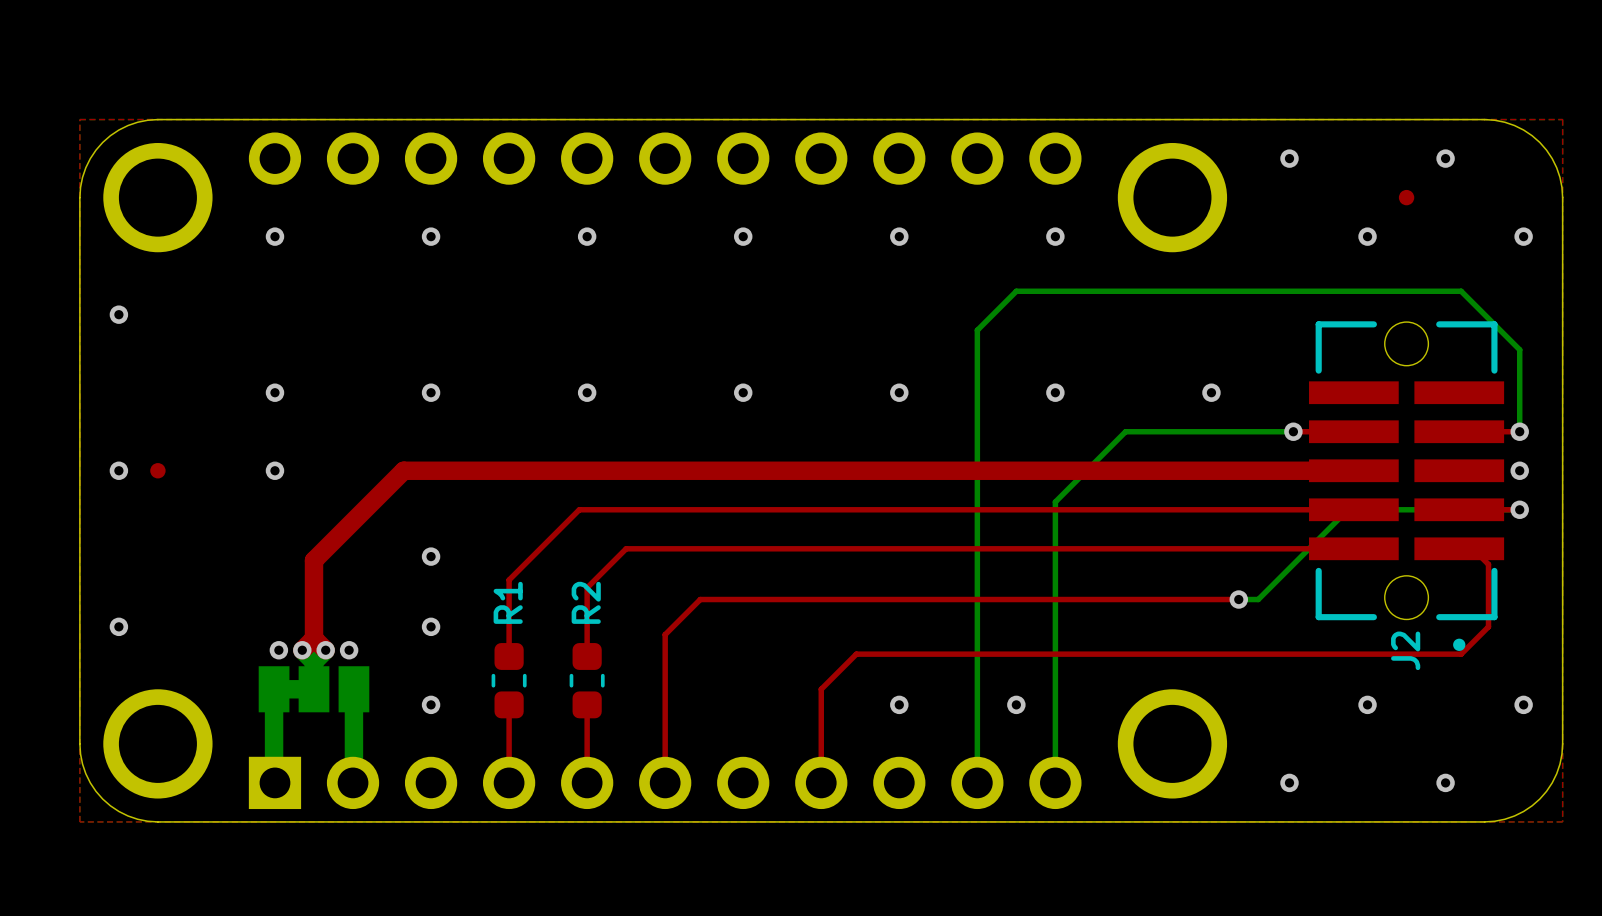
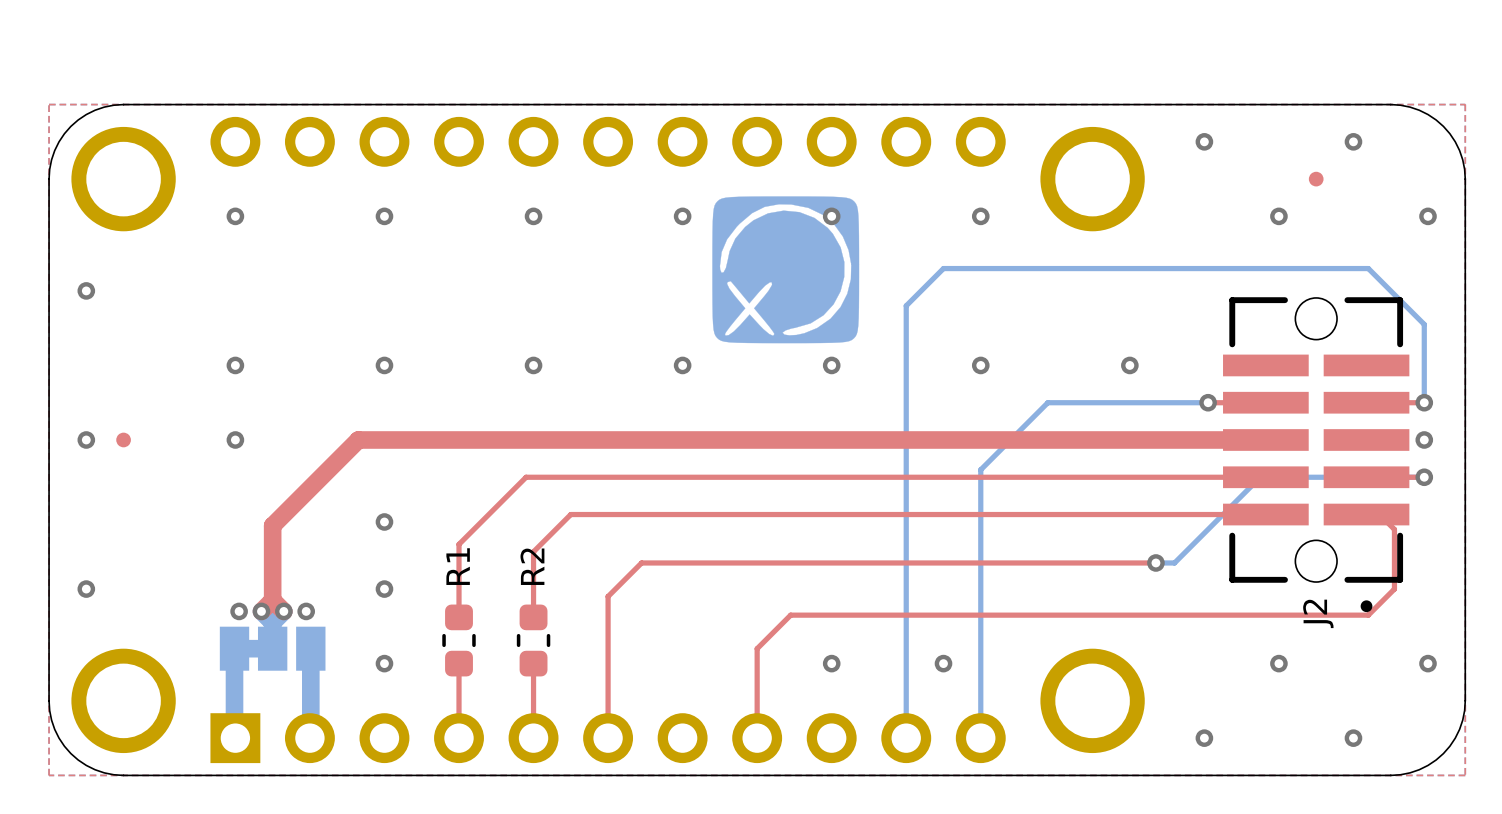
drawing: none -> [712, 196, 860, 344]

